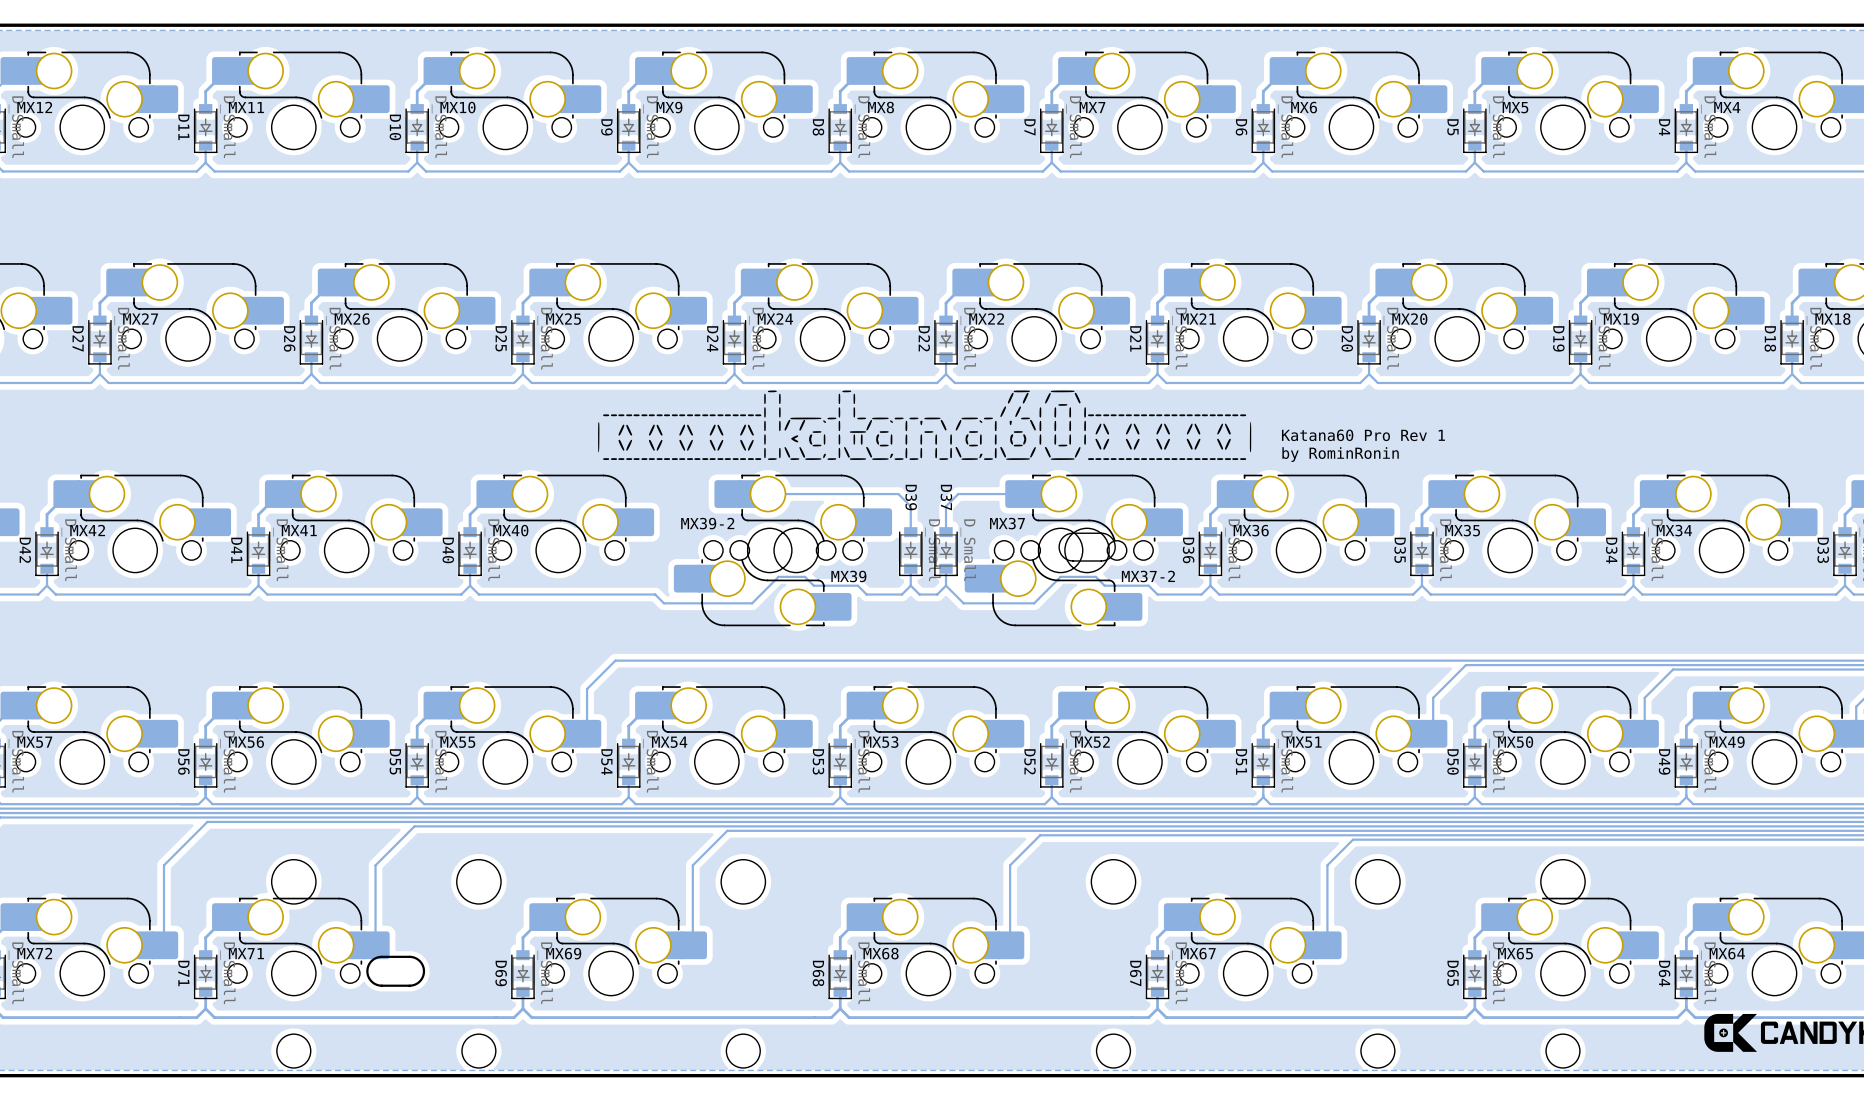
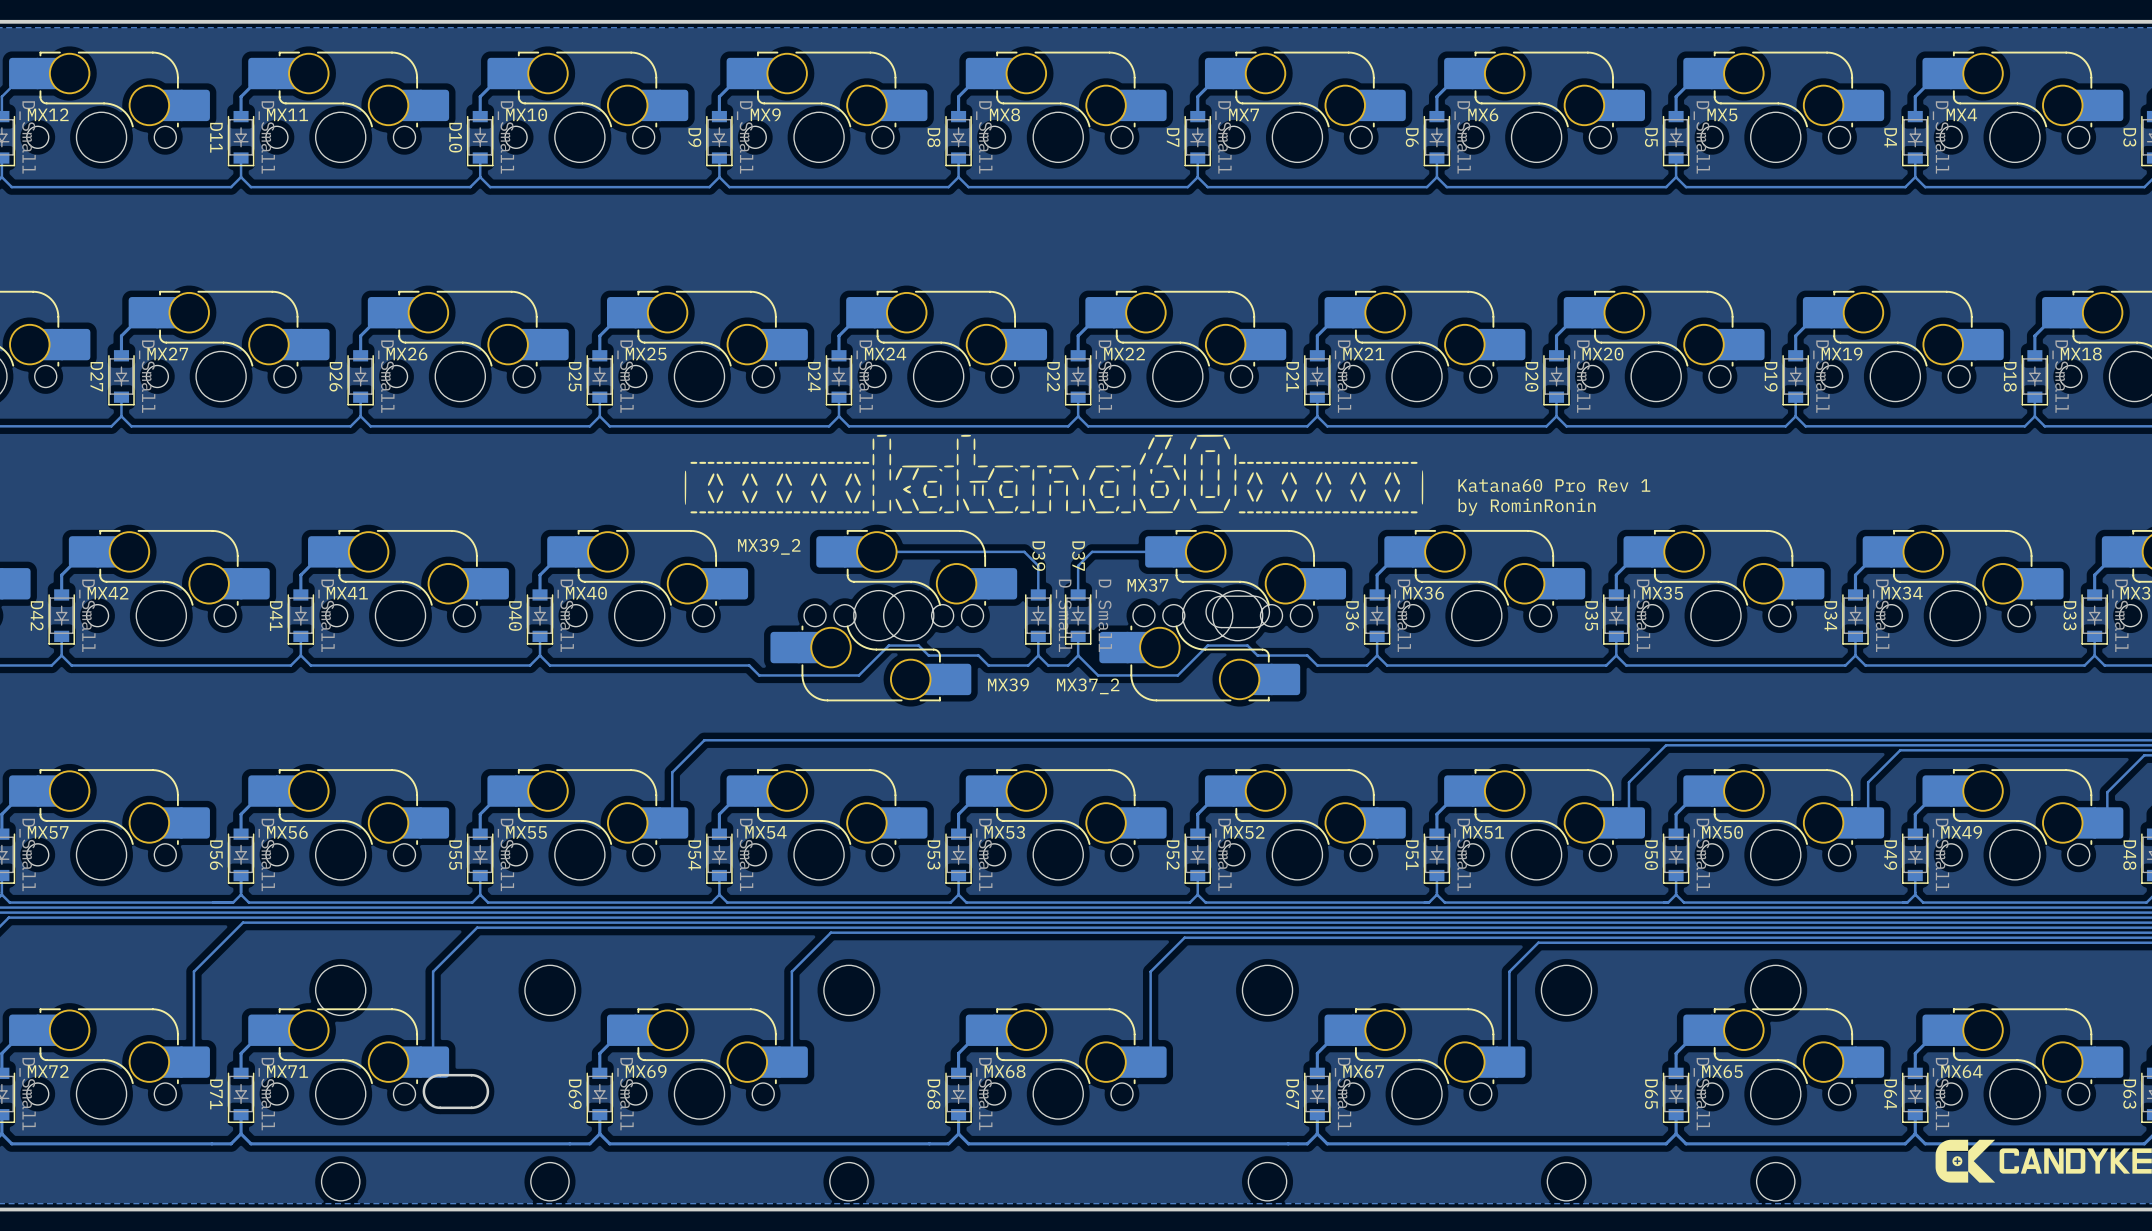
MX39-2 name: MX39-2 (707, 523) -> MX39_2 (769, 546)
MX39 name position: MX39 (848, 576) -> MX39 (1008, 684)
MX37-2 name: MX37-2 (1148, 576) -> MX37_2 (1088, 686)

